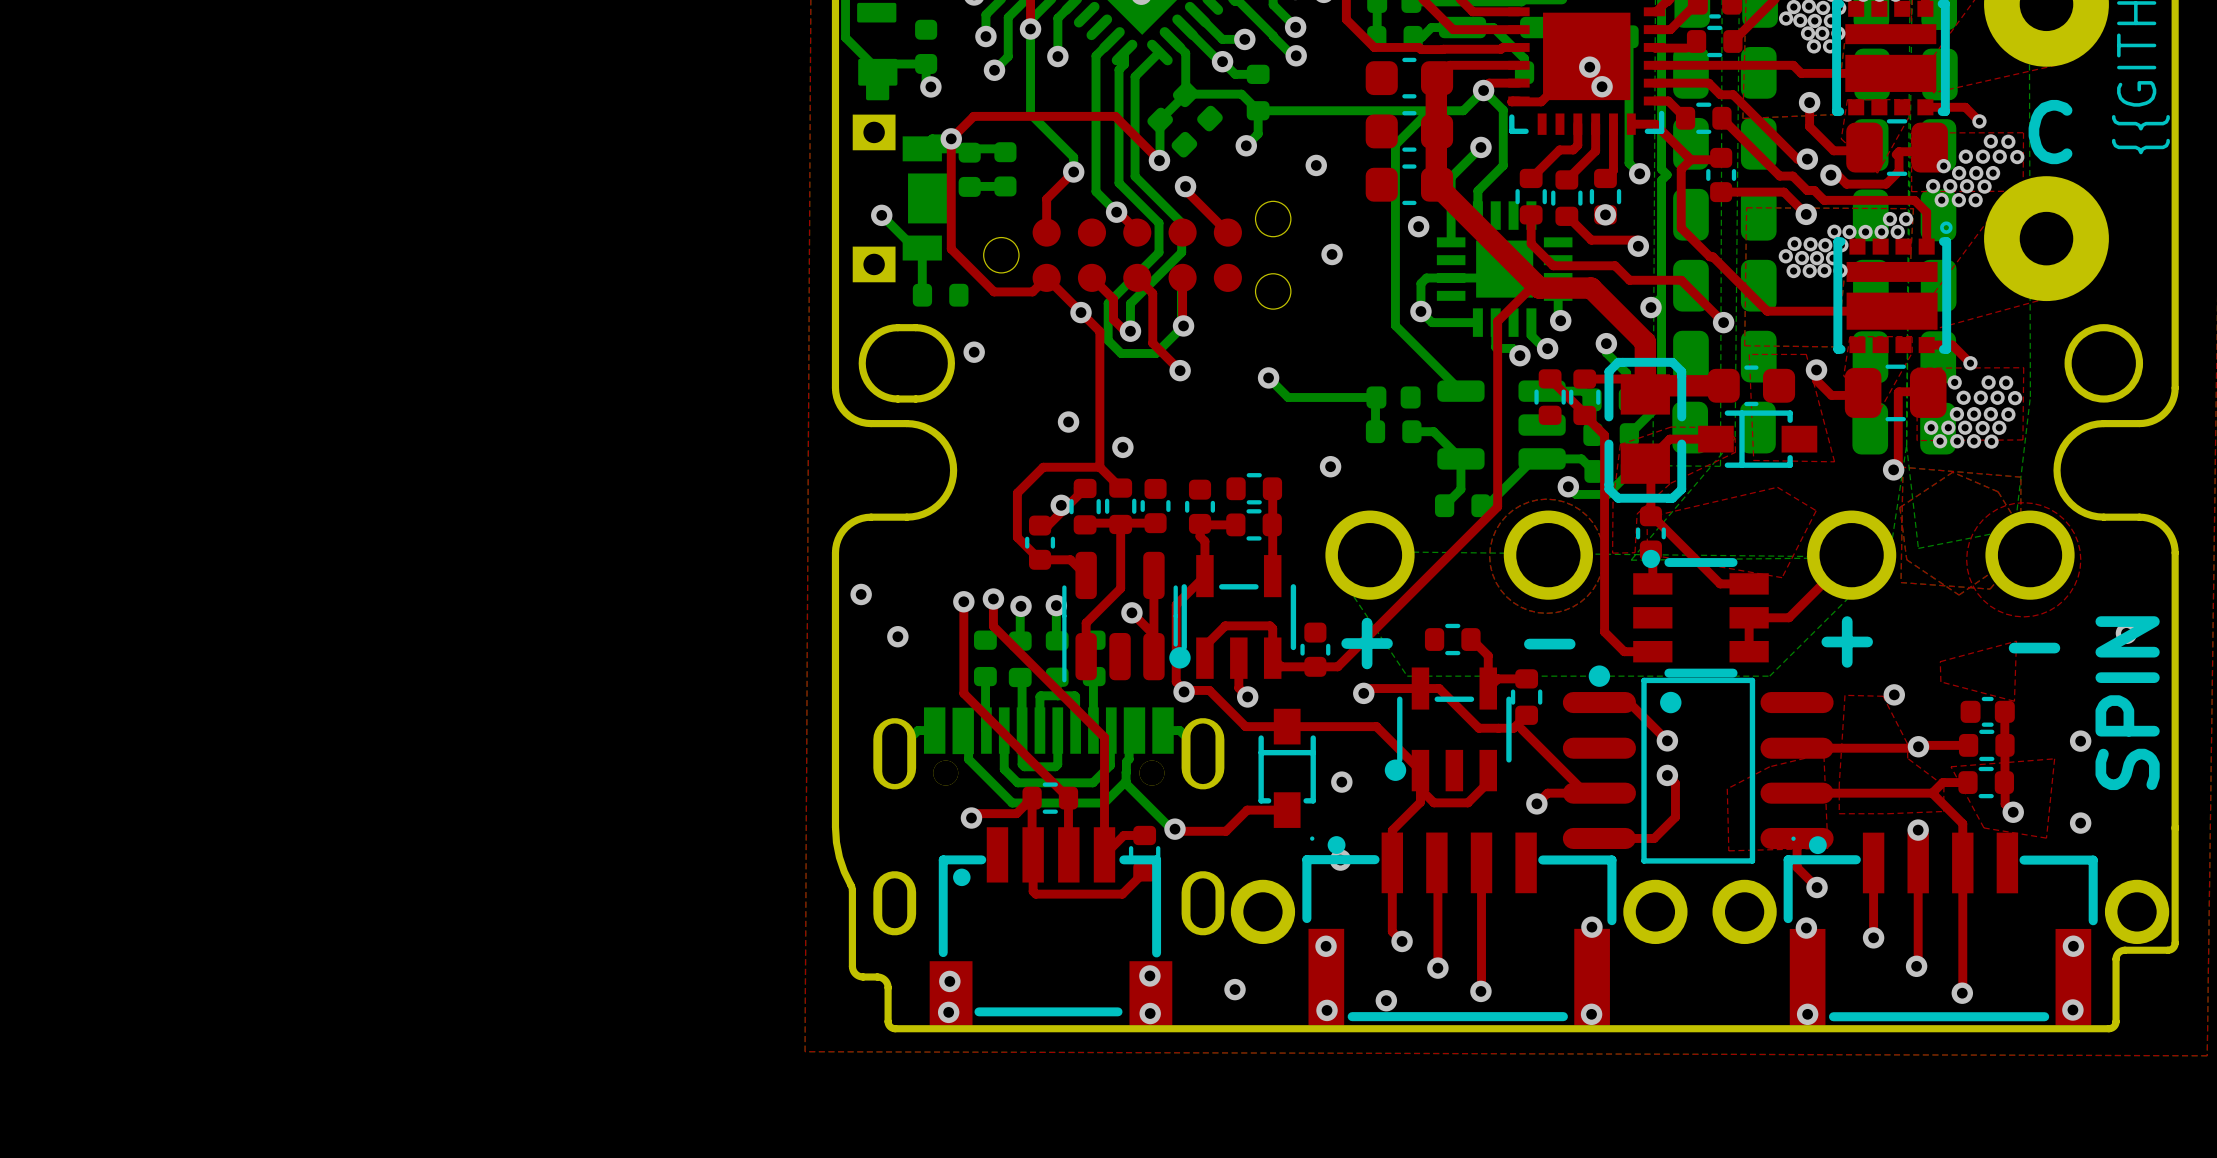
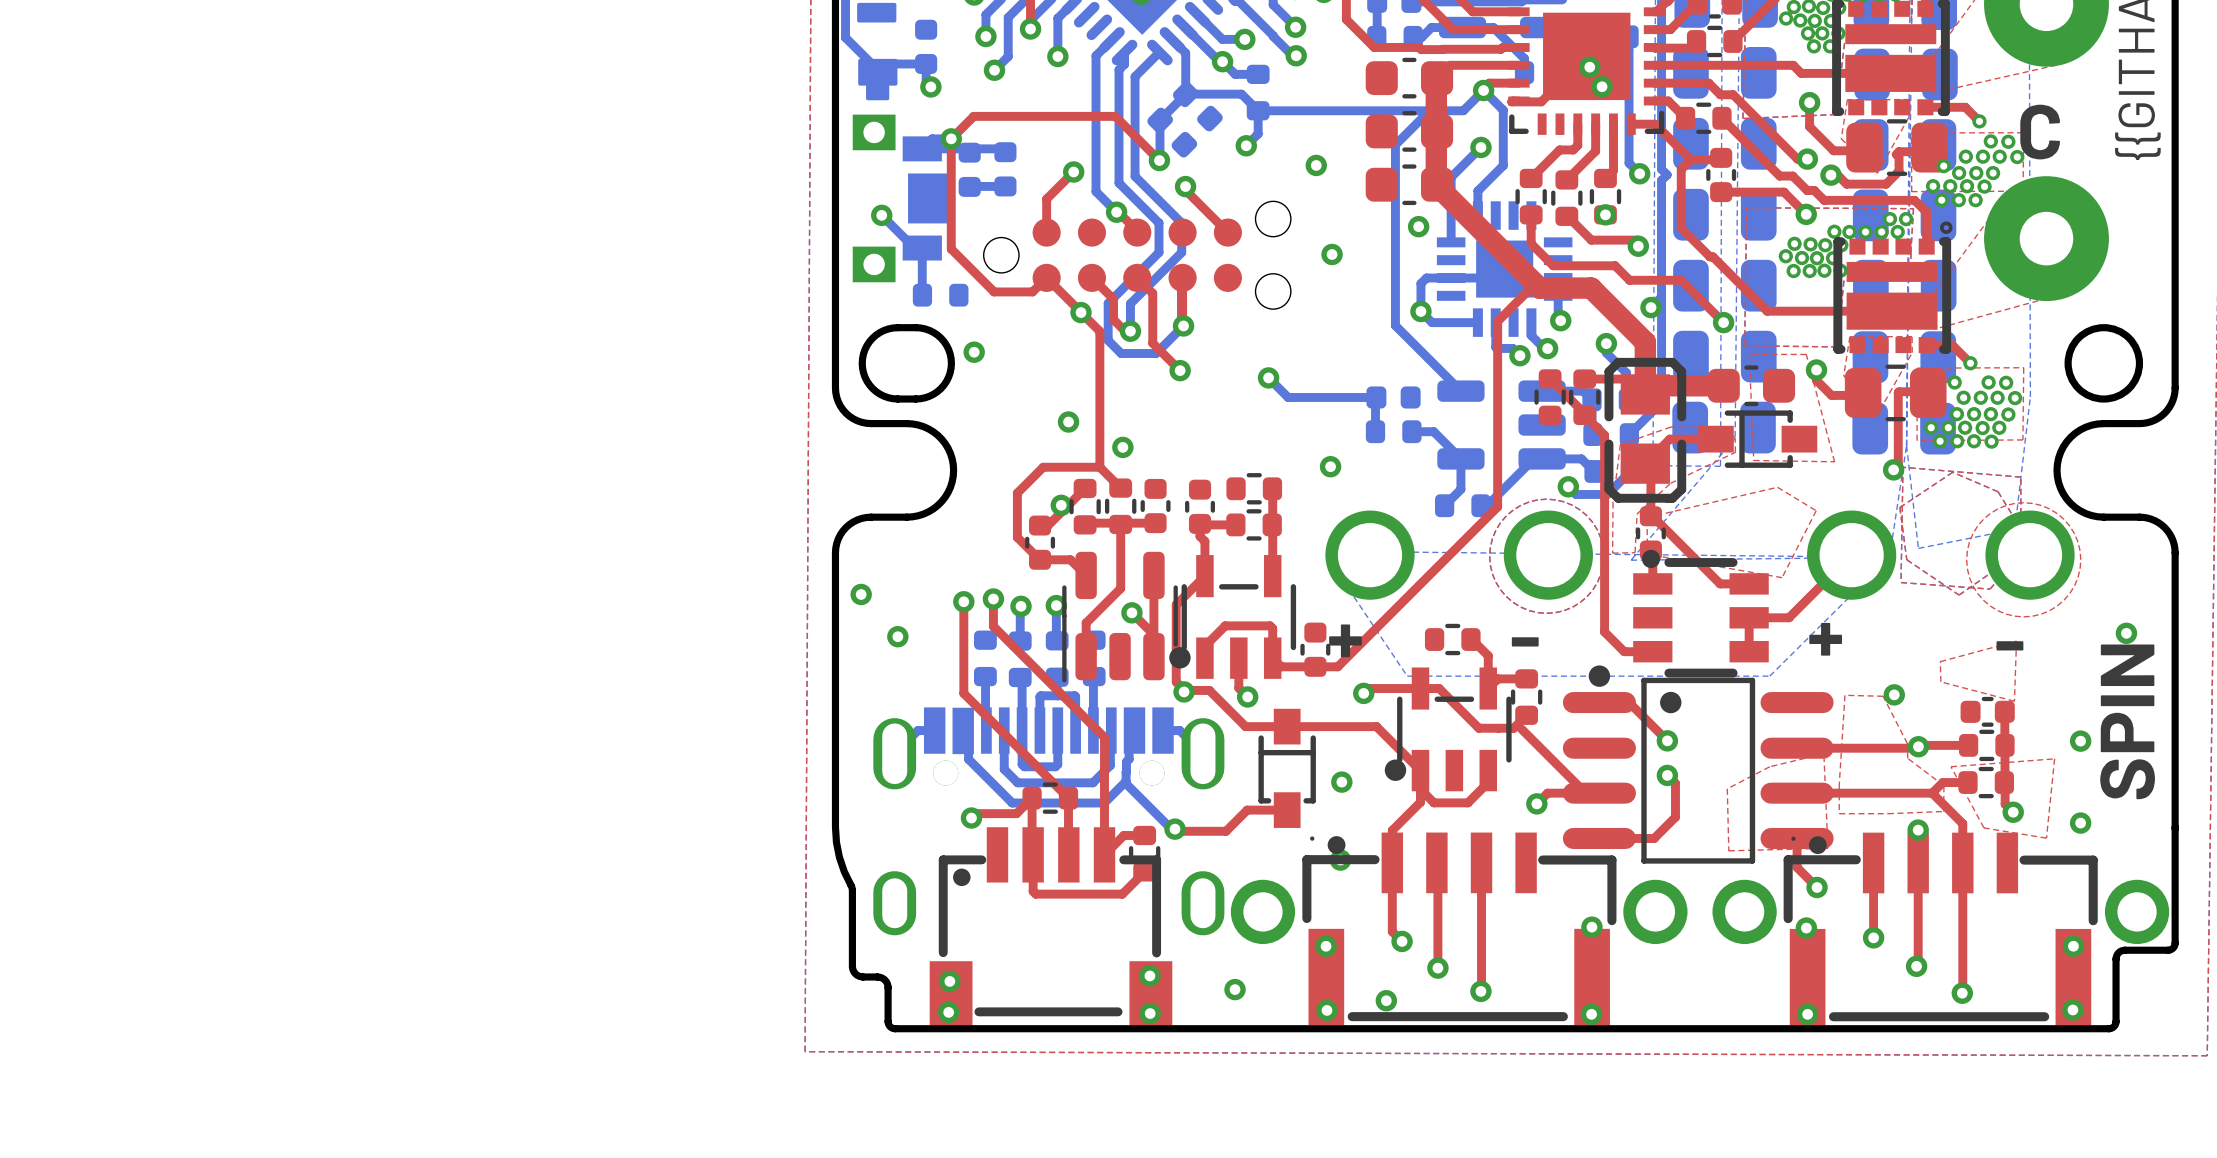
bottom track: (1030, 29) (1030, 114) (1073, 157) (1073, 172) -> none

